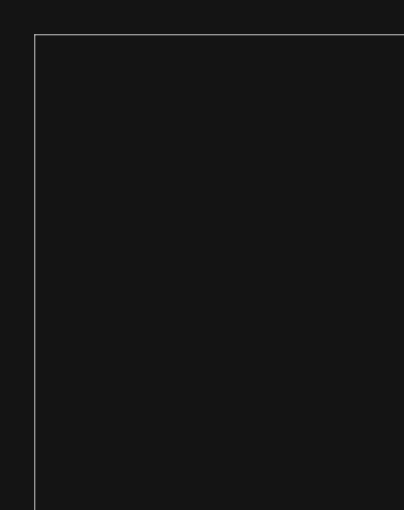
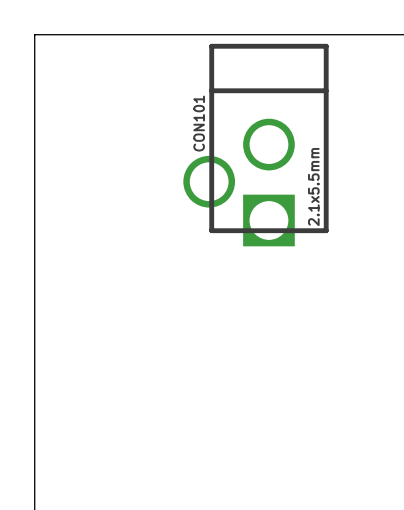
CON101: none -> (255, 145)

